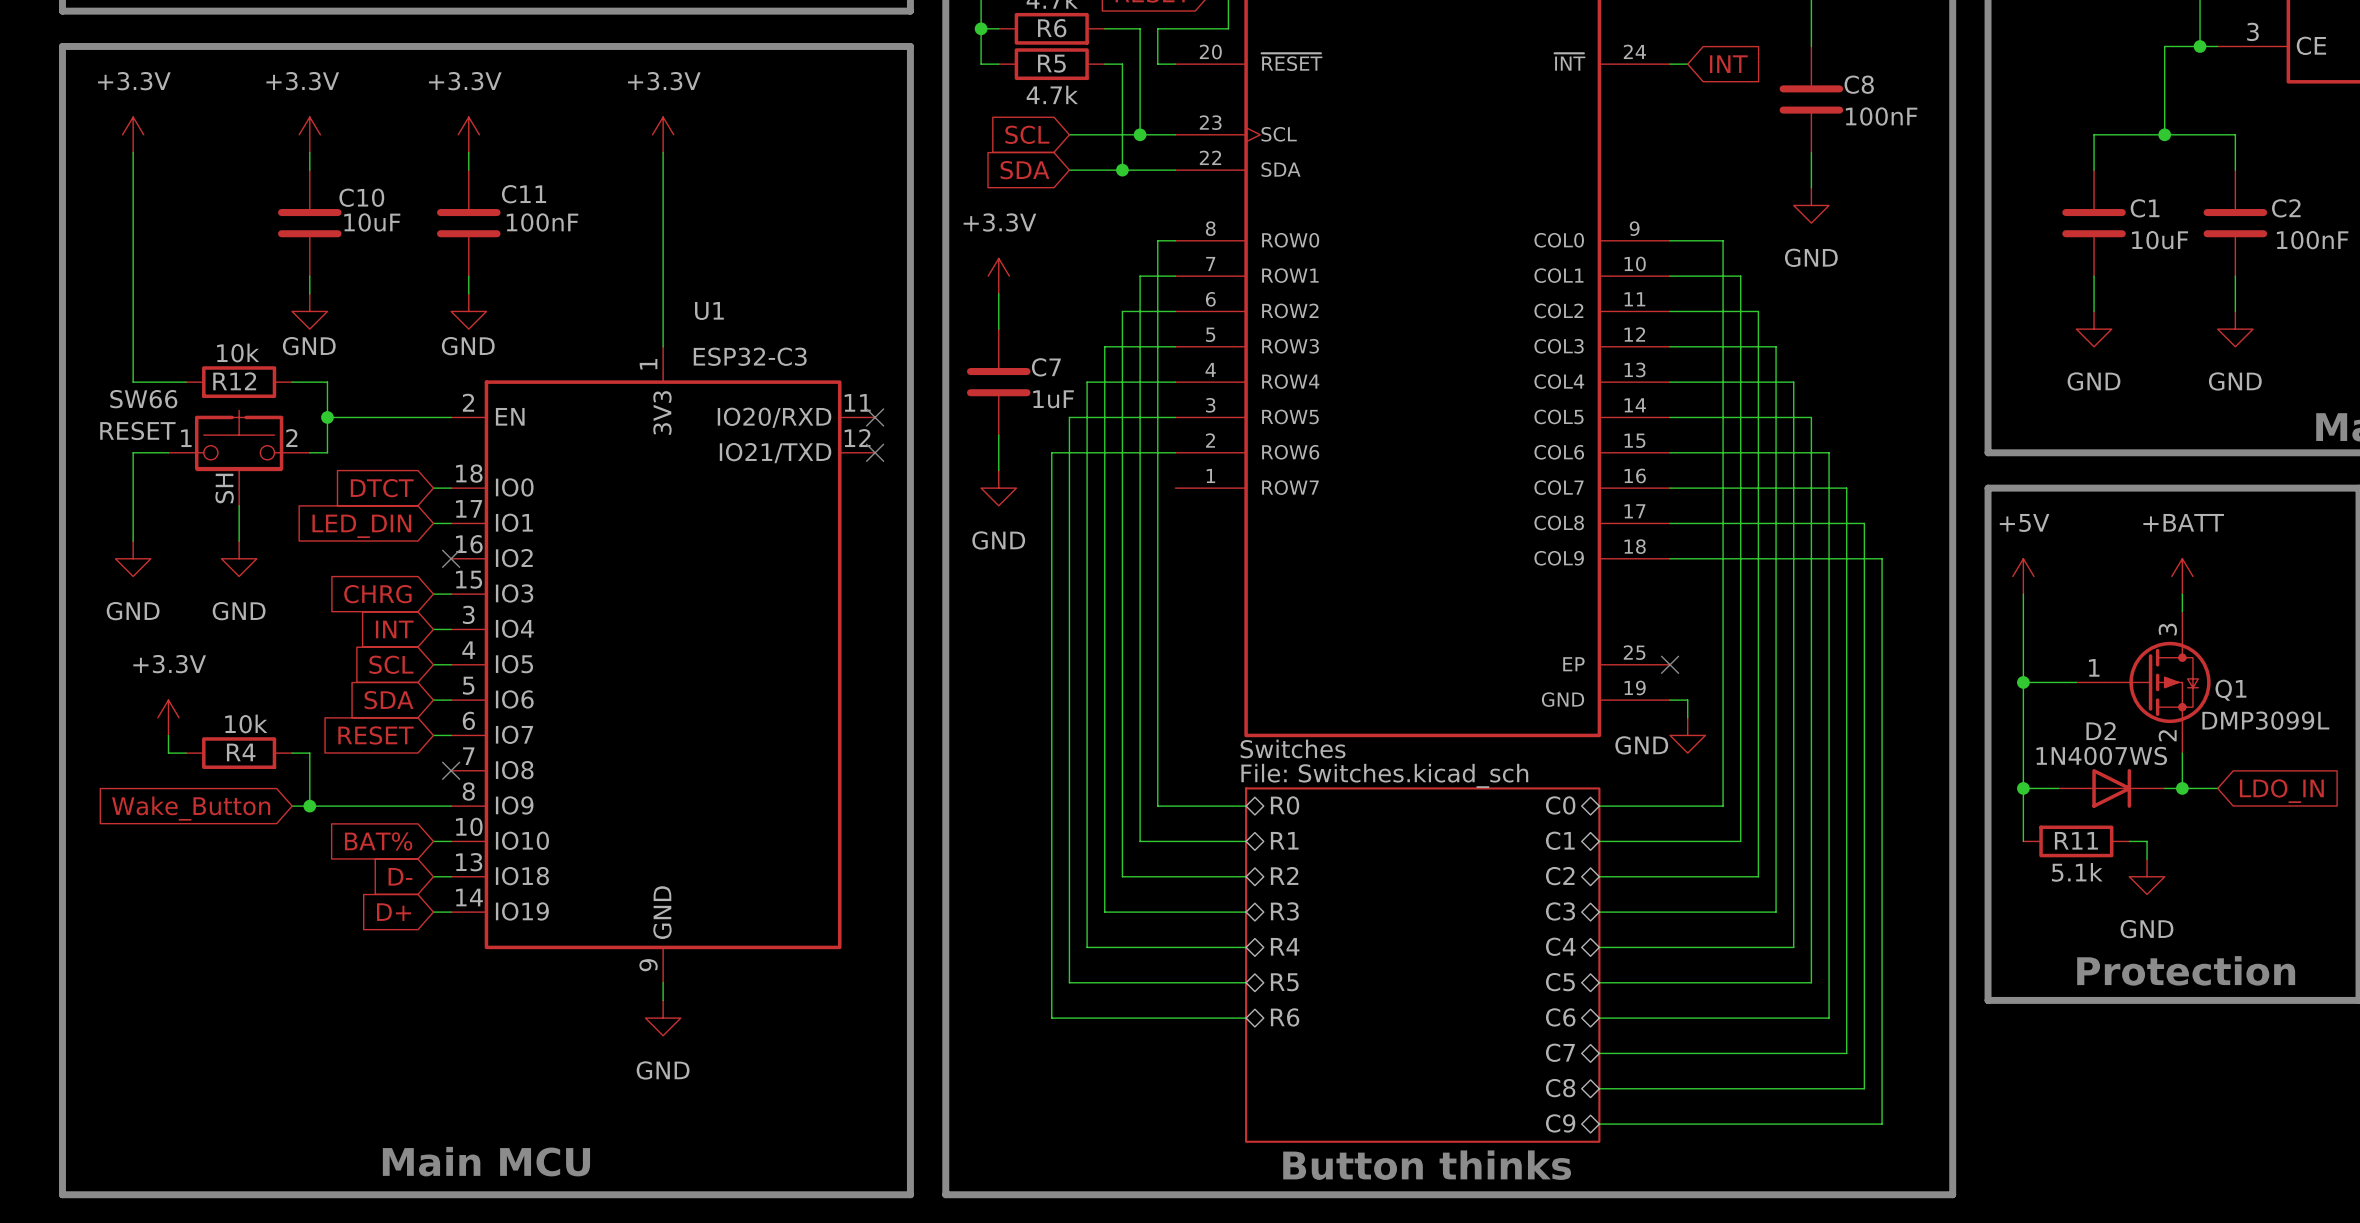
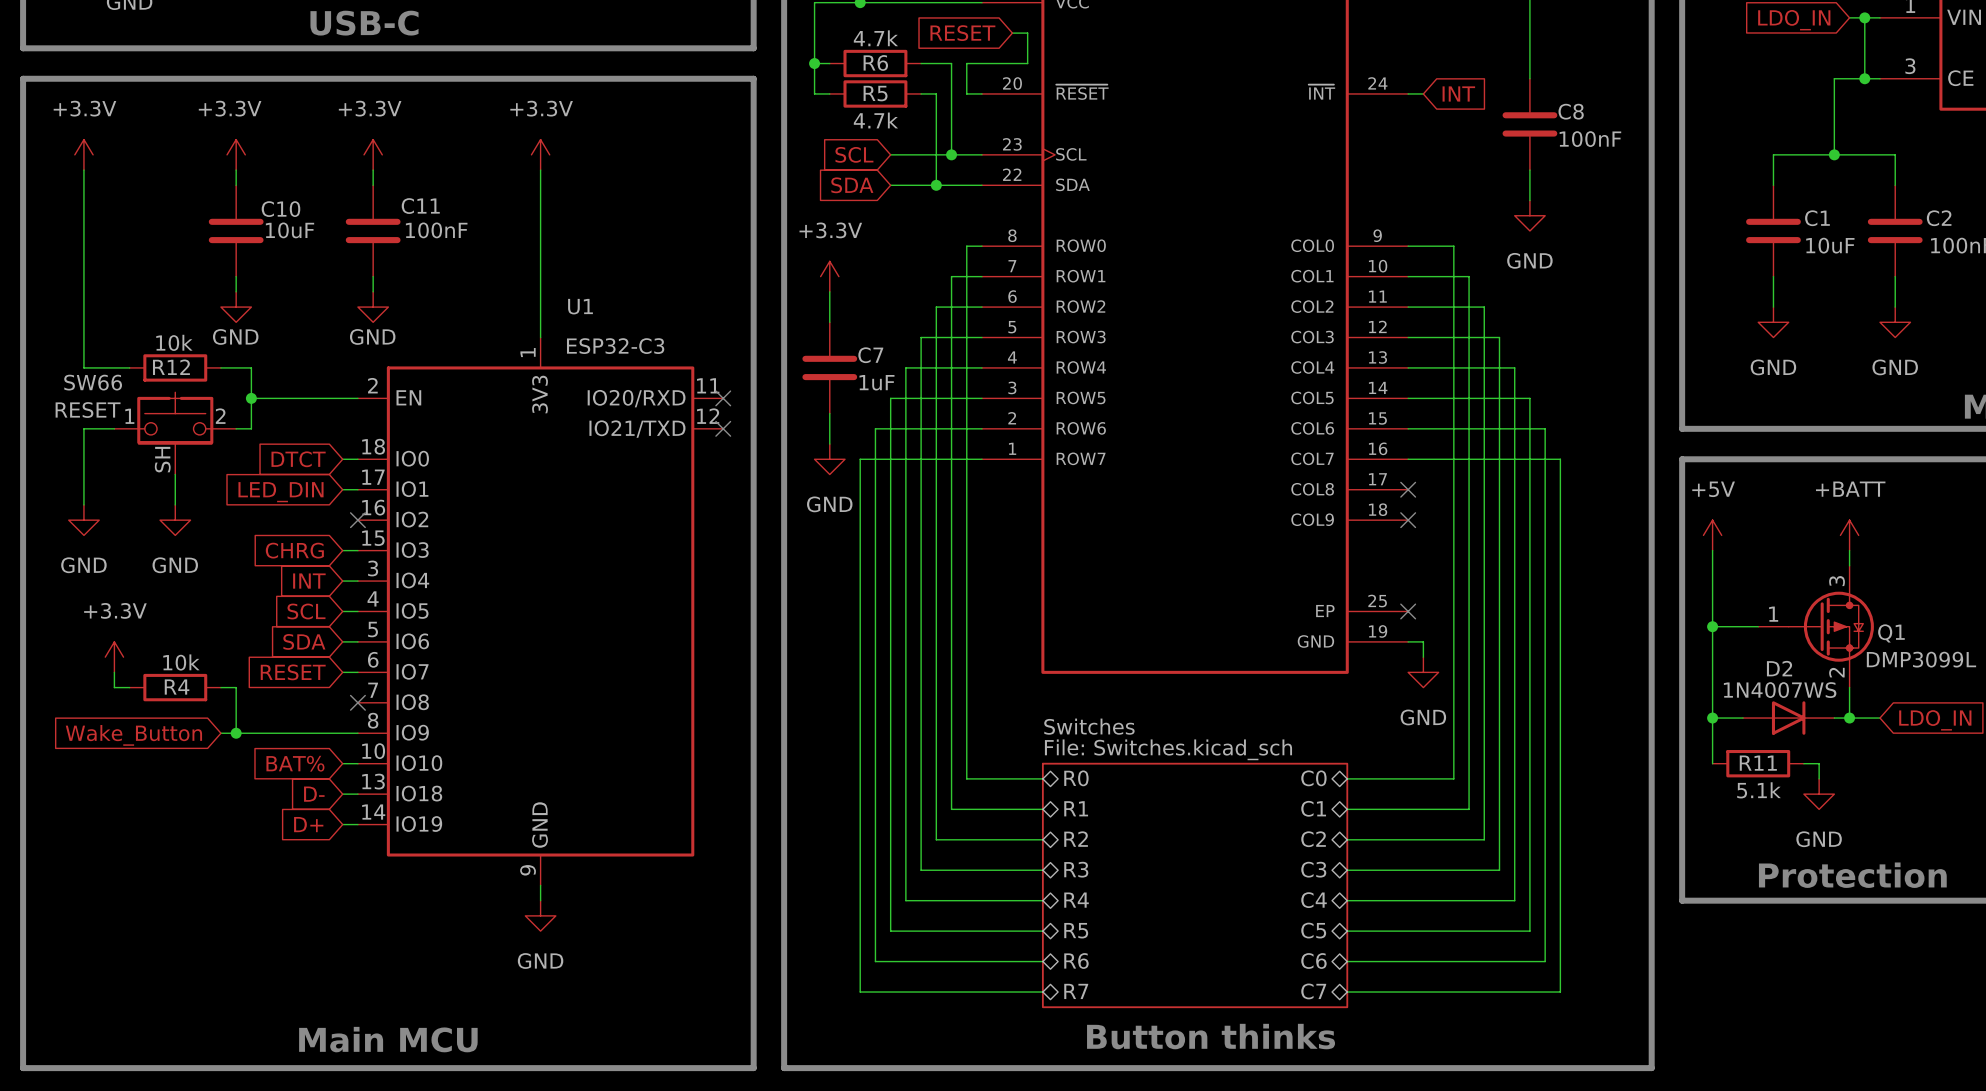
wire: none -> (981, 459) (860, 459) (860, 992) (1042, 992)
wire: (1670, 523) (1864, 523) (1864, 1088) (1599, 1088) -> none
no-connect mark: none -> (1408, 489)
wire: (1670, 558) (1882, 558) (1882, 1124) (1599, 1124) -> none
no-connect mark: none -> (1408, 520)
power symbol text position: GND (1641, 745) -> GND (1423, 717)
sheet pin position: R0 (1285, 805) -> R0 (1076, 778)
sheet pin position: C0 (1560, 805) -> C0 (1313, 778)
wire: (1157, 806) (1246, 806) -> (966, 733) (966, 778) (1042, 778)
wire: (1599, 806) (1723, 806) -> (1347, 778) (1453, 778) (1453, 733)
sheet pin position: R1 (1284, 840) -> R1 (1076, 808)
sheet pin position: C1 (1560, 840) -> C1 (1313, 808)
wire: (1140, 841) (1246, 841) -> (951, 763) (951, 809) (1042, 809)
wire: (1599, 841) (1740, 841) -> (1347, 809) (1469, 809) (1469, 763)
sheet pin position: R2 (1284, 875) -> R2 (1076, 839)
wire: (1122, 876) (1246, 876) -> (936, 794) (936, 839) (1042, 839)
sheet pin position: C2 (1560, 876) -> C2 (1313, 839)
wire: (1599, 876) (1758, 876) -> (1347, 839) (1484, 839) (1484, 794)
sheet pin position: R3 (1284, 911) -> R3 (1076, 869)
sheet pin position: C3 (1560, 911) -> C3 (1313, 869)
wire: (1104, 912) (1246, 912) -> (921, 824) (921, 870) (1042, 870)
wire: (1599, 912) (1776, 912) -> (1347, 870) (1499, 870) (1499, 824)
sheet pin position: R4 (1285, 946) -> R4 (1076, 900)
sheet pin position: C4 (1560, 946) -> C4 (1314, 900)
wire: (1087, 947) (1246, 947) -> (905, 855) (905, 900) (1042, 900)
wire: (1599, 947) (1793, 947) -> (1347, 900) (1514, 900) (1514, 855)
sheet Switches: File: Switches.kicad_sch (1422, 965) -> none
wire: (1069, 982) (1246, 982) -> (890, 885) (890, 931) (1042, 931)
sheet pin position: R5 (1284, 982) -> R5 (1076, 930)
sheet Switches: none -> File: Switches.kicad_sch (1195, 885)
sheet pin position: C5 (1560, 982) -> C5 (1313, 930)
wire: (1599, 982) (1811, 982) -> (1347, 931) (1529, 931) (1529, 885)
sheet pin position: R6 (1285, 1017) -> R6 (1076, 961)
sheet pin position: C6 (1560, 1017) -> C6 (1313, 961)
wire: (1051, 1018) (1246, 1018) -> (875, 915) (875, 961) (1042, 961)
wire: (1599, 1018) (1829, 1018) -> (1347, 961) (1545, 961) (1545, 915)
sheet pin position: C7 (1560, 1052) -> C7 (1313, 991)
wire: (1599, 1053) (1846, 1053) -> (1347, 992) (1560, 992) (1560, 946)
sheet pin: C8 (1560, 1088) -> none
sheet pin: none -> R7 (1076, 991)
sheet pin: C9 (1560, 1123) -> none
text position: Button thinks (1427, 1165) -> Button thinks (1211, 1036)

